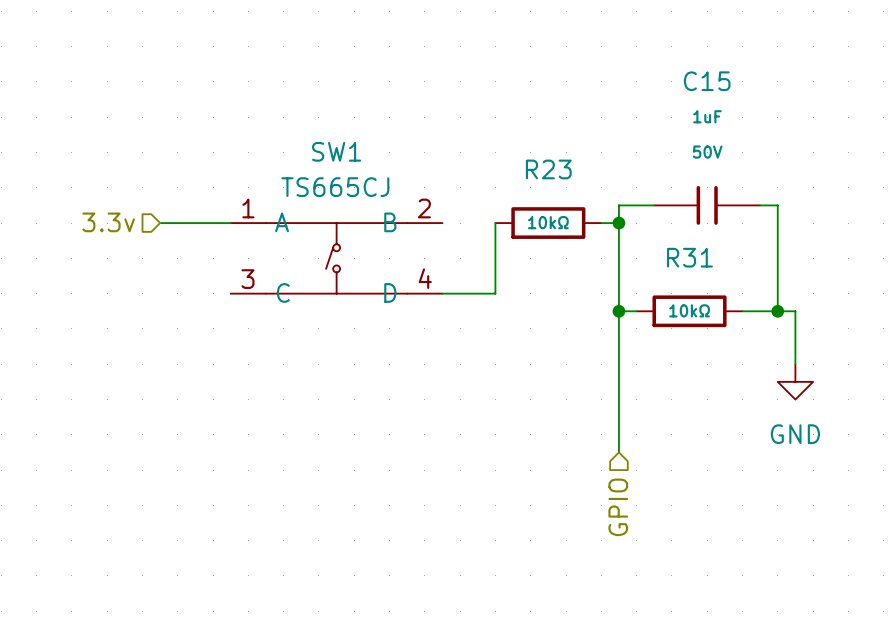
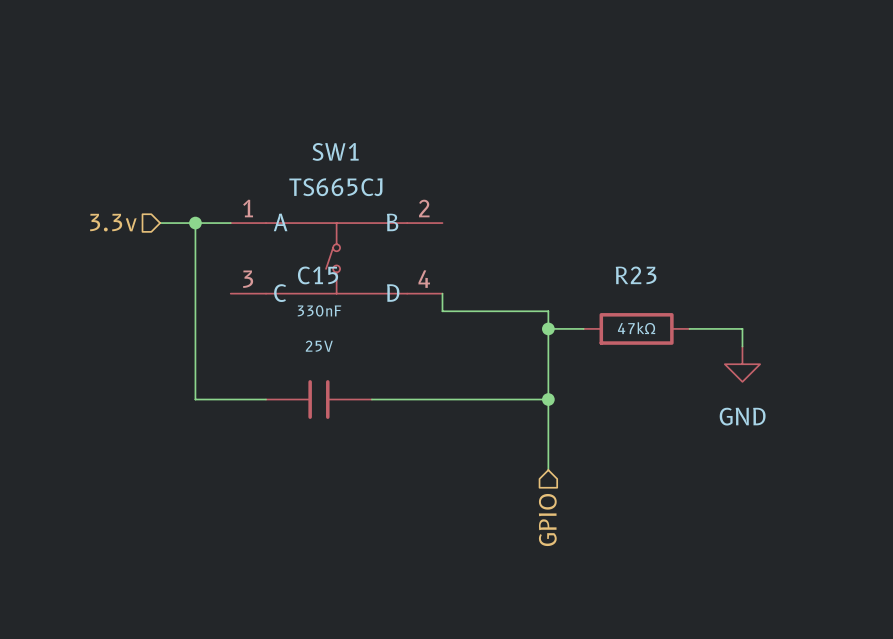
C15 value: 1uF (707, 116) -> 330nF (319, 310)
C15 text: 50V (707, 152) -> 25V (319, 346)
wire: (654, 205) (618, 205) (618, 452) -> none
C15 position: (707, 205) -> (318, 399)
wire: (760, 205) (777, 205) (777, 311) -> none
R23 value: 10kΩ (548, 222) -> 47kΩ (636, 328)
wire: none -> (195, 223) (195, 399) (266, 399)
junction: none -> (195, 223)
wire: (495, 223) (495, 293) (442, 293) -> (548, 470) (548, 311) (442, 311) (442, 293)
R23 position: (548, 223) -> (636, 328)
wire: (601, 223) (618, 223) -> none
junction: (618, 223) -> none
wire: (618, 311) (636, 311) -> none
junction: (618, 311) -> none
R31: 10kΩ (689, 311) -> none
wire: (742, 311) (795, 311) (795, 364) -> none
junction: (777, 311) -> none
wire: none -> (548, 328) (583, 328)
junction: none -> (548, 328)
wire: none -> (689, 328) (742, 328) (742, 346)
power symbol position: GND (795, 381) -> GND (742, 364)
wire: none -> (371, 399) (548, 399)
junction: none -> (548, 399)
hierarchical label position: GPIO (618, 507) -> GPIO (547, 520)

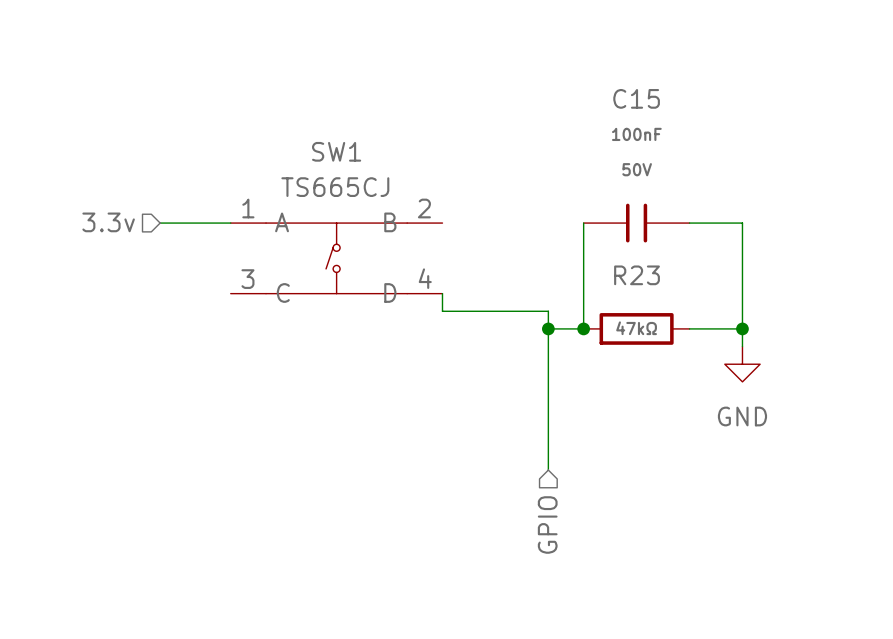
wire: (195, 223) (195, 399) (266, 399) -> none
junction: (195, 223) -> none
wire: none -> (583, 223) (583, 328)
wire: none -> (689, 223) (742, 223) (742, 328)
C15 value: 330nF (319, 310) -> 100nF (636, 134)
junction: none -> (742, 328)
C15 text: 25V (319, 346) -> 50V (637, 169)
C15 position: (318, 399) -> (636, 223)
wire: (371, 399) (548, 399) -> none
junction position: (548, 399) -> (583, 328)

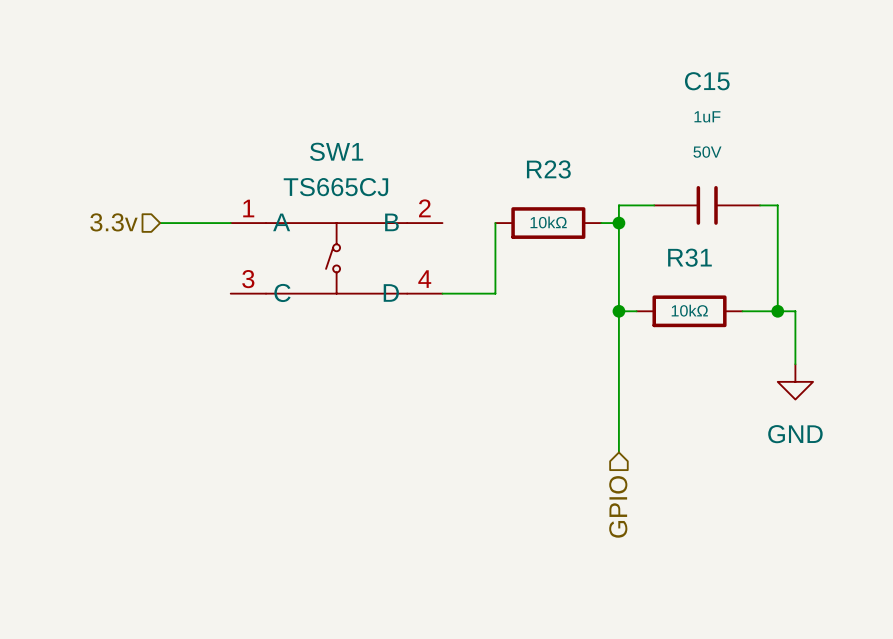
C15 value: 100nF (636, 134) -> 1uF (707, 116)
wire: none -> (654, 205) (618, 205) (618, 452)
wire: none -> (760, 205) (777, 205) (777, 311)
wire: (583, 223) (583, 328) (548, 328) -> none
junction: none -> (618, 223)
C15 position: (636, 223) -> (707, 205)
wire: (689, 223) (742, 223) (742, 346) -> none
wire: (442, 293) (442, 311) (548, 311) (548, 470) -> (442, 293) (495, 293) (495, 223)
wire: none -> (618, 311) (636, 311)
junction: none -> (618, 311)
R31: none -> 10kΩ (689, 311)
wire: none -> (742, 311) (795, 311) (795, 364)
junction: (548, 328) -> none
junction: (583, 328) -> none
R23 position: (636, 328) -> (548, 223)
R23 value: 47kΩ (636, 328) -> 10kΩ (548, 222)
wire: (689, 328) (742, 328) -> none
junction position: (742, 328) -> (777, 311)
power symbol position: GND (742, 364) -> GND (795, 381)
hierarchical label position: GPIO (547, 524) -> GPIO (618, 506)

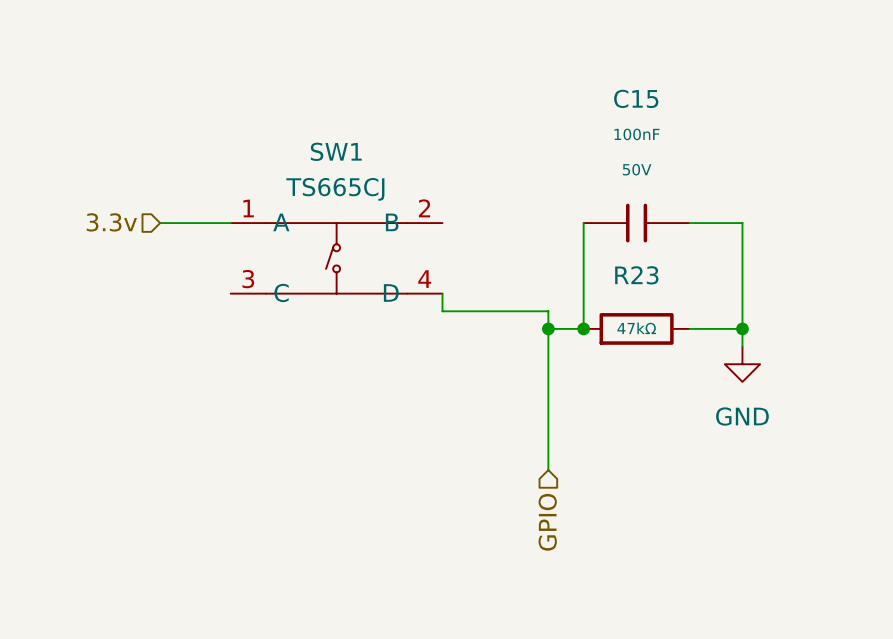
C15 value: 1uF (707, 116) -> 100nF (636, 134)
wire: (654, 205) (618, 205) (618, 452) -> none
C15 position: (707, 205) -> (636, 223)
wire: (760, 205) (777, 205) (777, 311) -> none
R23 value: 10kΩ (548, 222) -> 47kΩ (636, 328)
wire: (495, 223) (495, 293) (442, 293) -> (548, 470) (548, 311) (442, 311) (442, 293)
R23 position: (548, 223) -> (636, 328)
wire: none -> (583, 223) (583, 328) (548, 328)
junction: (618, 223) -> none
wire: none -> (689, 223) (742, 223) (742, 346)
wire: (618, 311) (636, 311) -> none
junction: (618, 311) -> none
R31: 10kΩ (689, 311) -> none
wire: (742, 311) (795, 311) (795, 364) -> none
junction position: (777, 311) -> (742, 328)
junction: none -> (548, 328)
junction: none -> (583, 328)
wire: none -> (689, 328) (742, 328)
power symbol position: GND (795, 381) -> GND (742, 364)
hierarchical label position: GPIO (618, 506) -> GPIO (547, 522)

